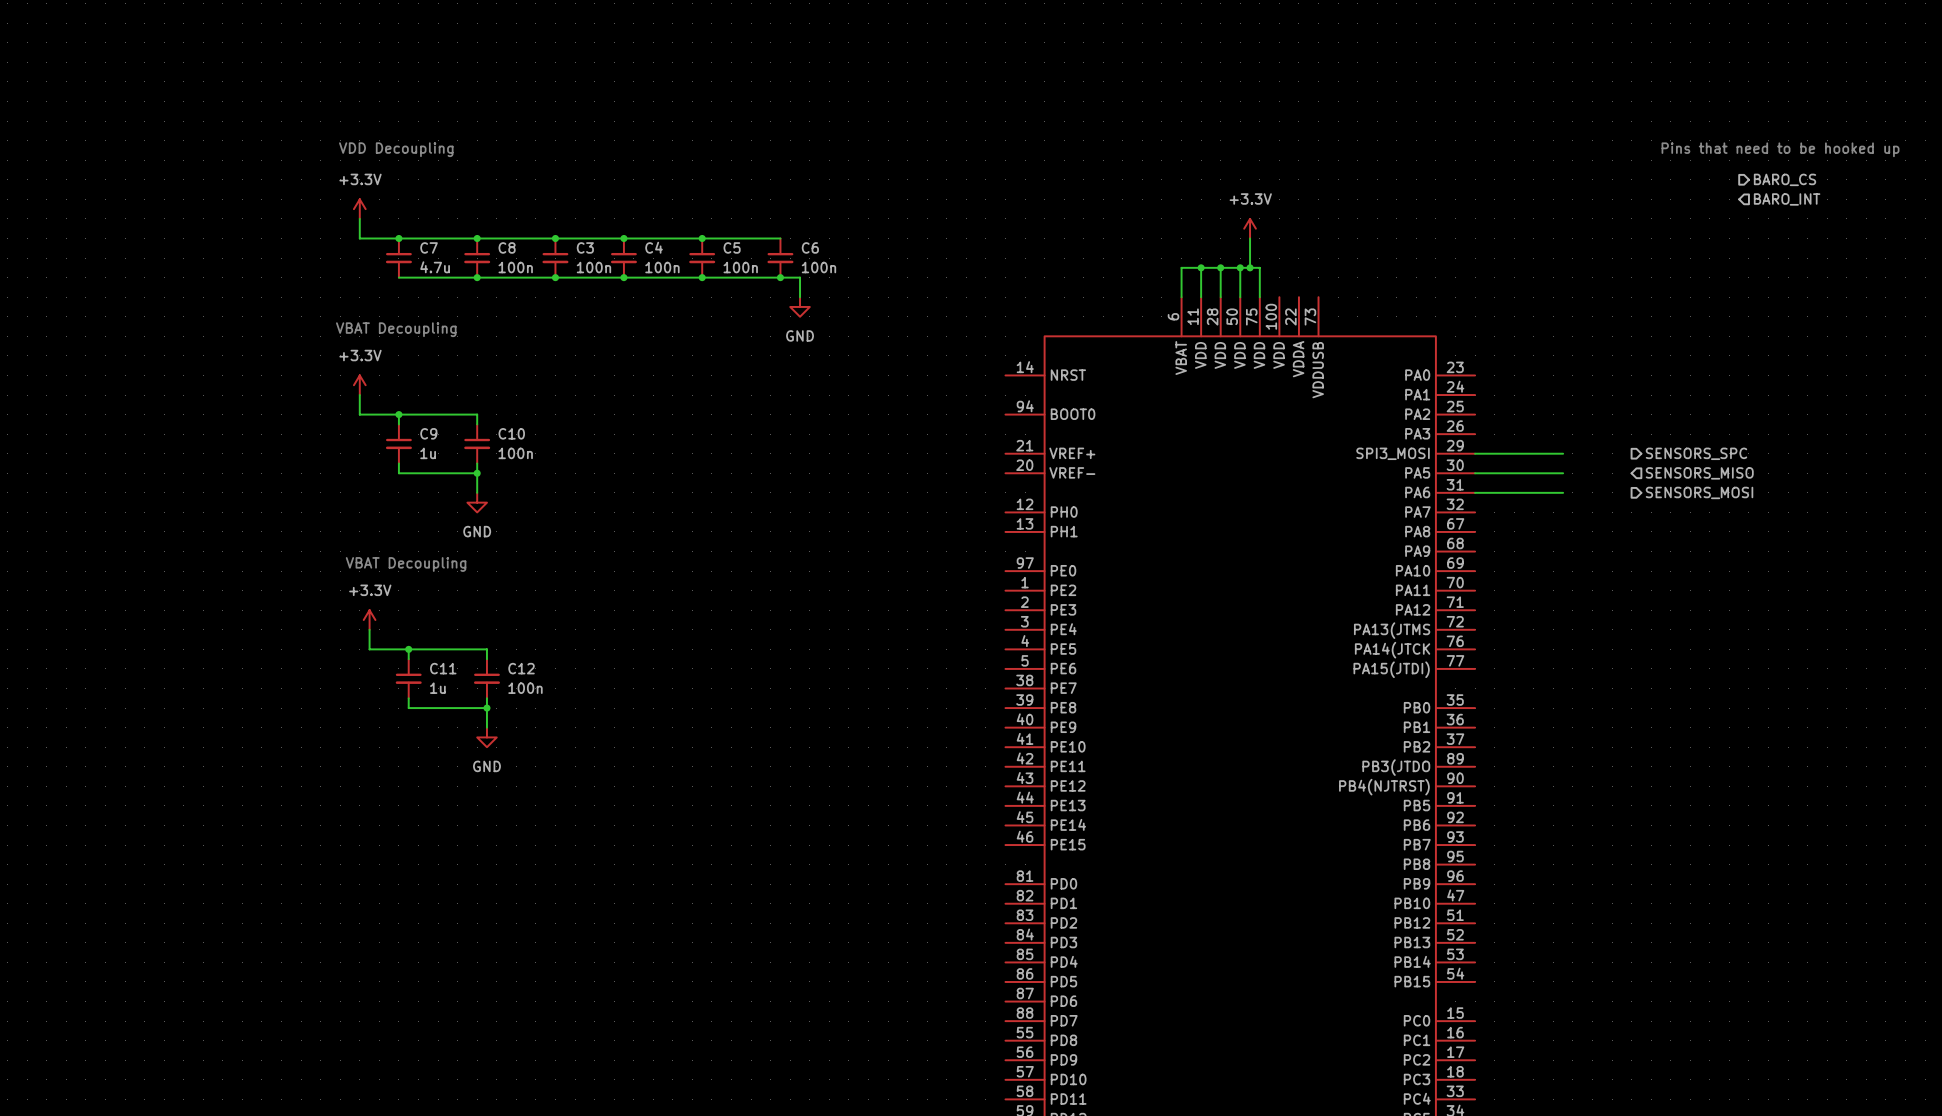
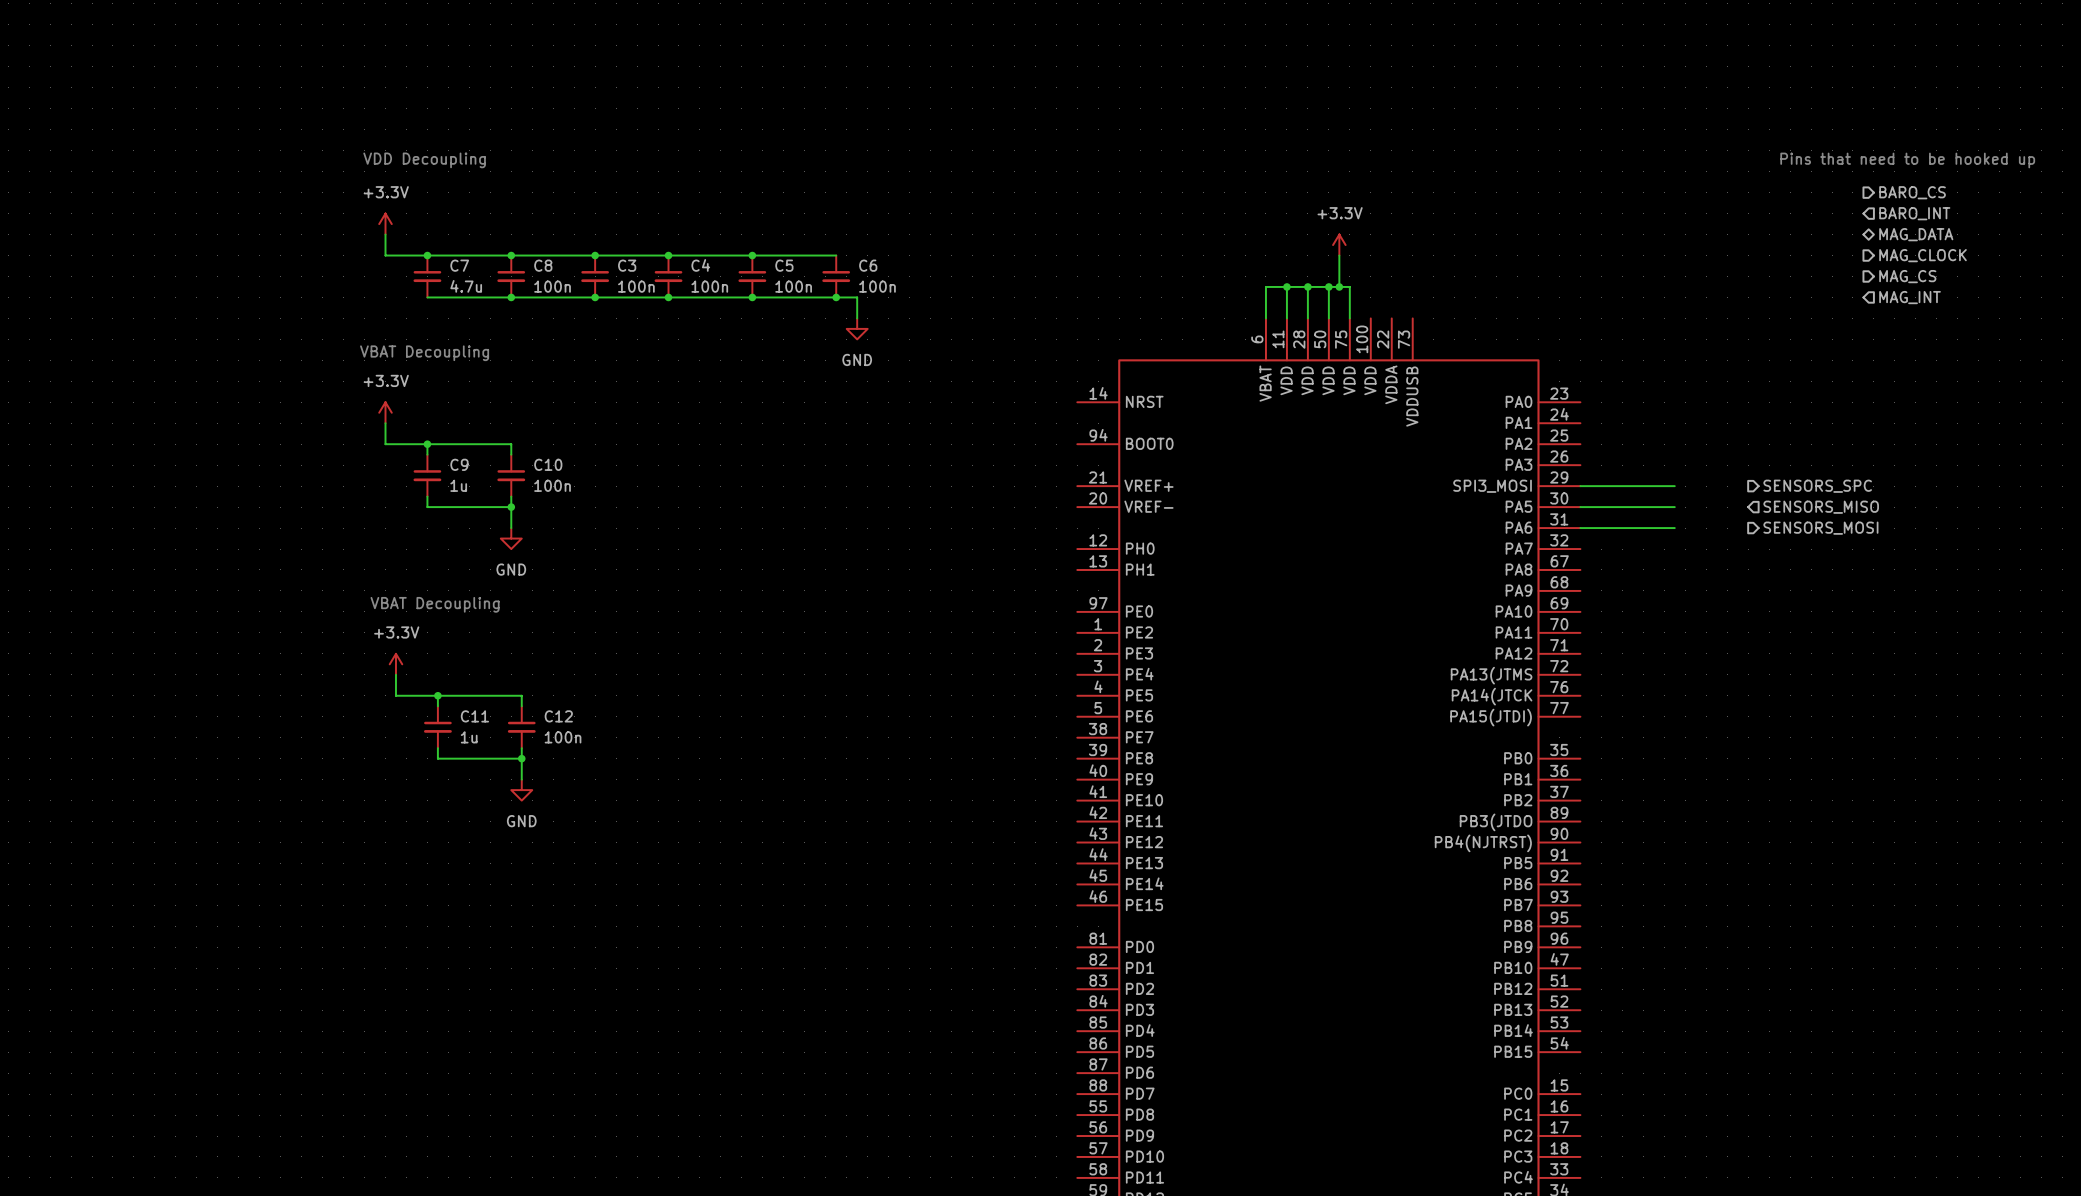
hierarchical label: none -> MAG_DATA (1916, 234)
hierarchical label: none -> MAG_CLOCK (1923, 255)
hierarchical label: none -> MAG_CS (1907, 276)
hierarchical label: none -> MAG_INT (1910, 297)

